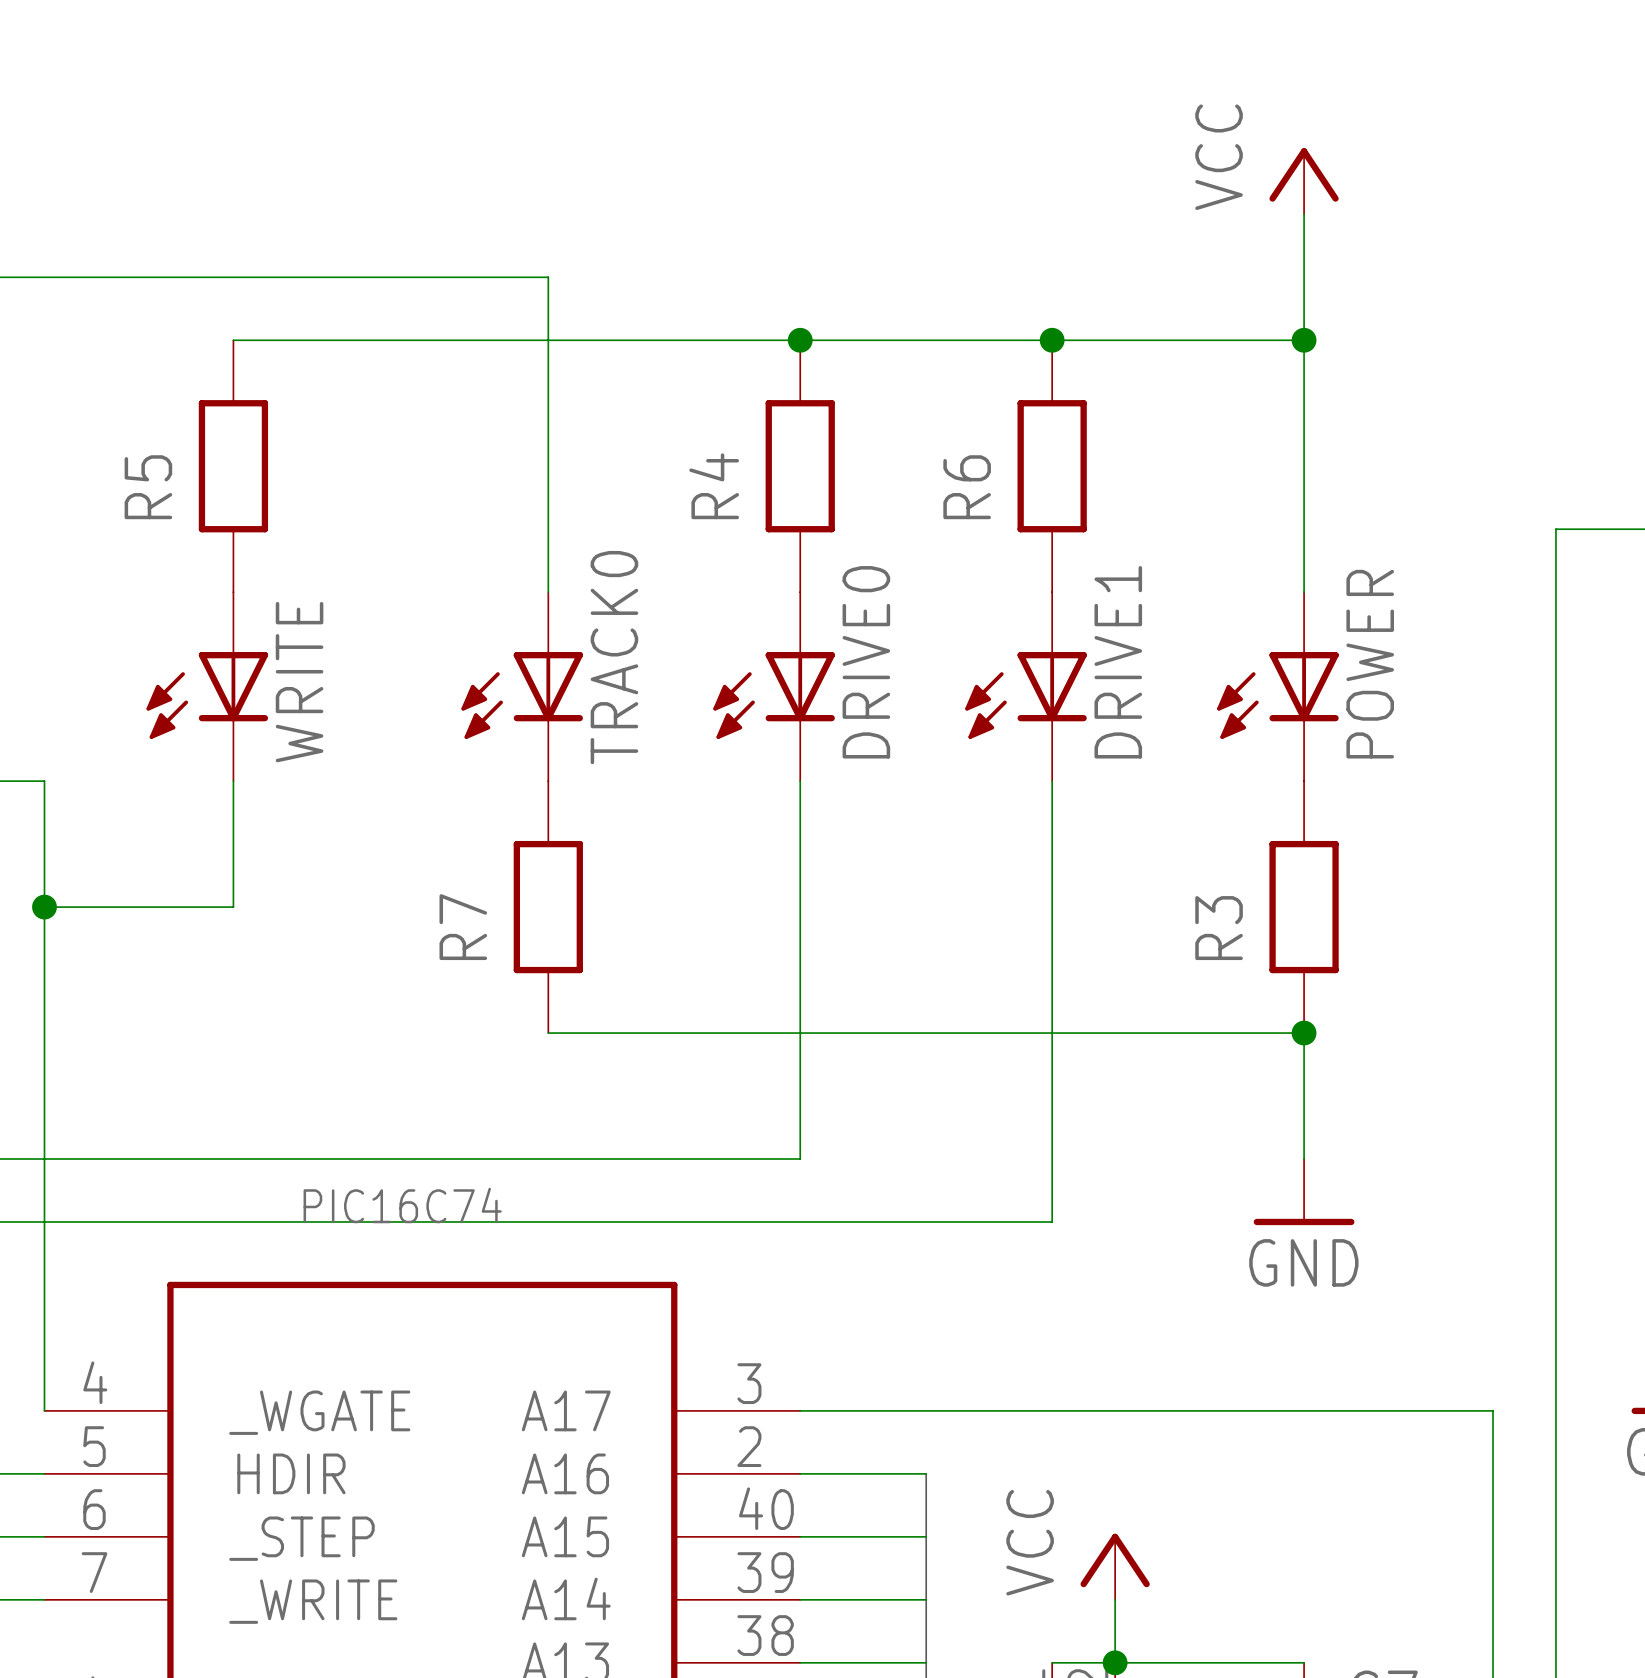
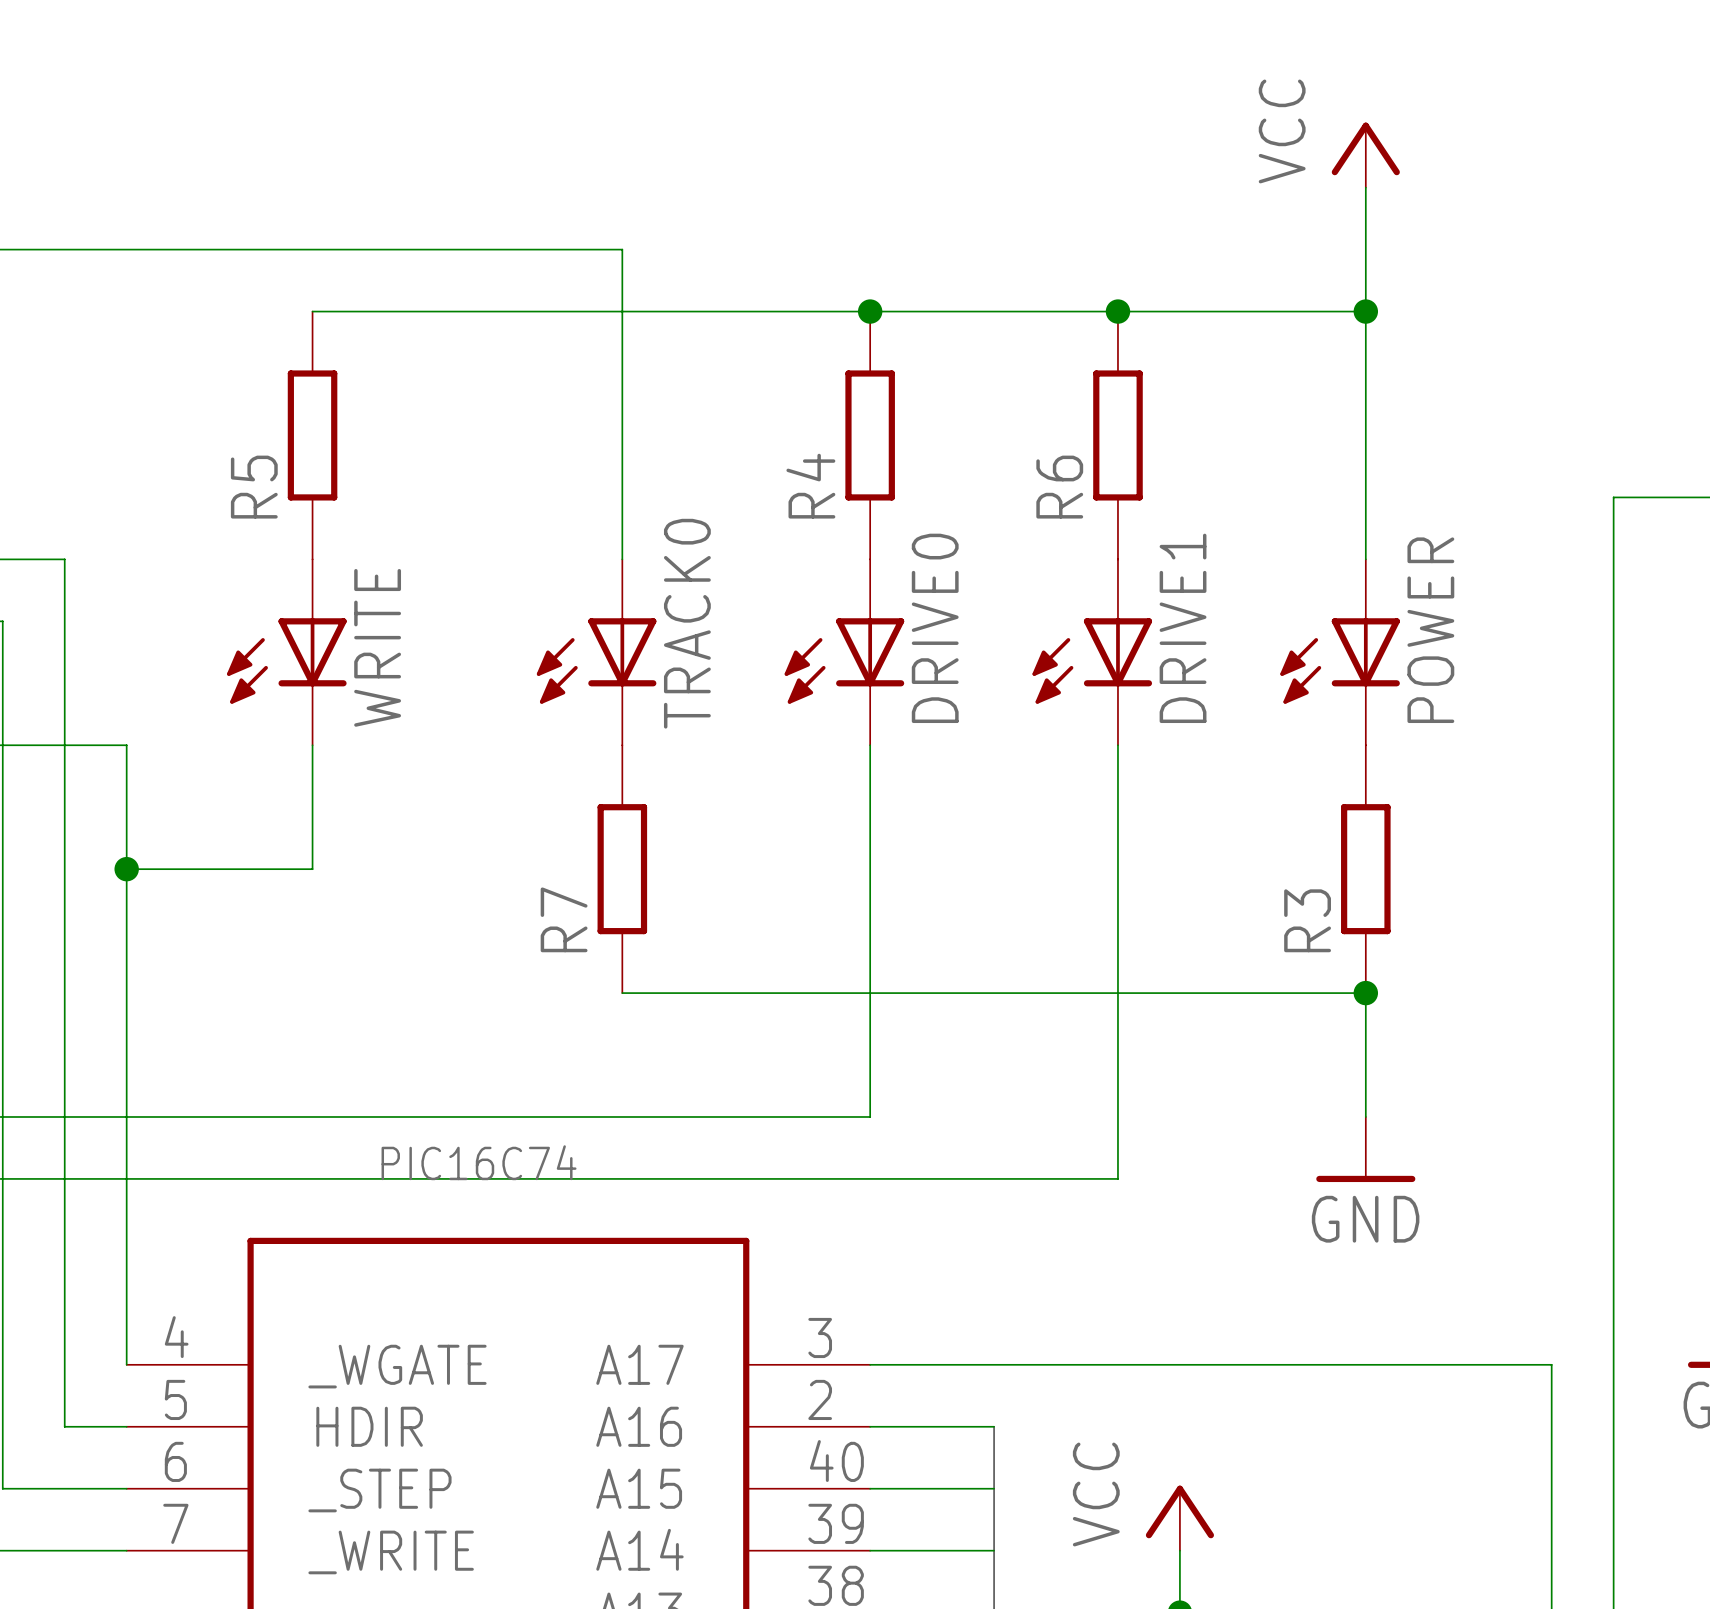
R5 symbol: [198, 340, 269, 593] -> [287, 311, 338, 560]
R4 symbol: [765, 340, 835, 593] -> [845, 311, 895, 560]
R6 symbol: [1017, 340, 1087, 593] -> [1093, 311, 1143, 560]
R4 name position: R4 (714, 486) -> R4 (810, 486)
R5 name position: R5 (148, 487) -> R5 (254, 487)
R6 name position: R6 (967, 487) -> R6 (1059, 487)
R7 symbol: [513, 781, 583, 1034] -> [597, 745, 648, 994]
R3 symbol: [1269, 781, 1339, 1034] -> [1341, 745, 1391, 994]
R7 name position: R7 (463, 927) -> R7 (564, 919)
R3 name position: R3 (1219, 928) -> R3 (1307, 920)

